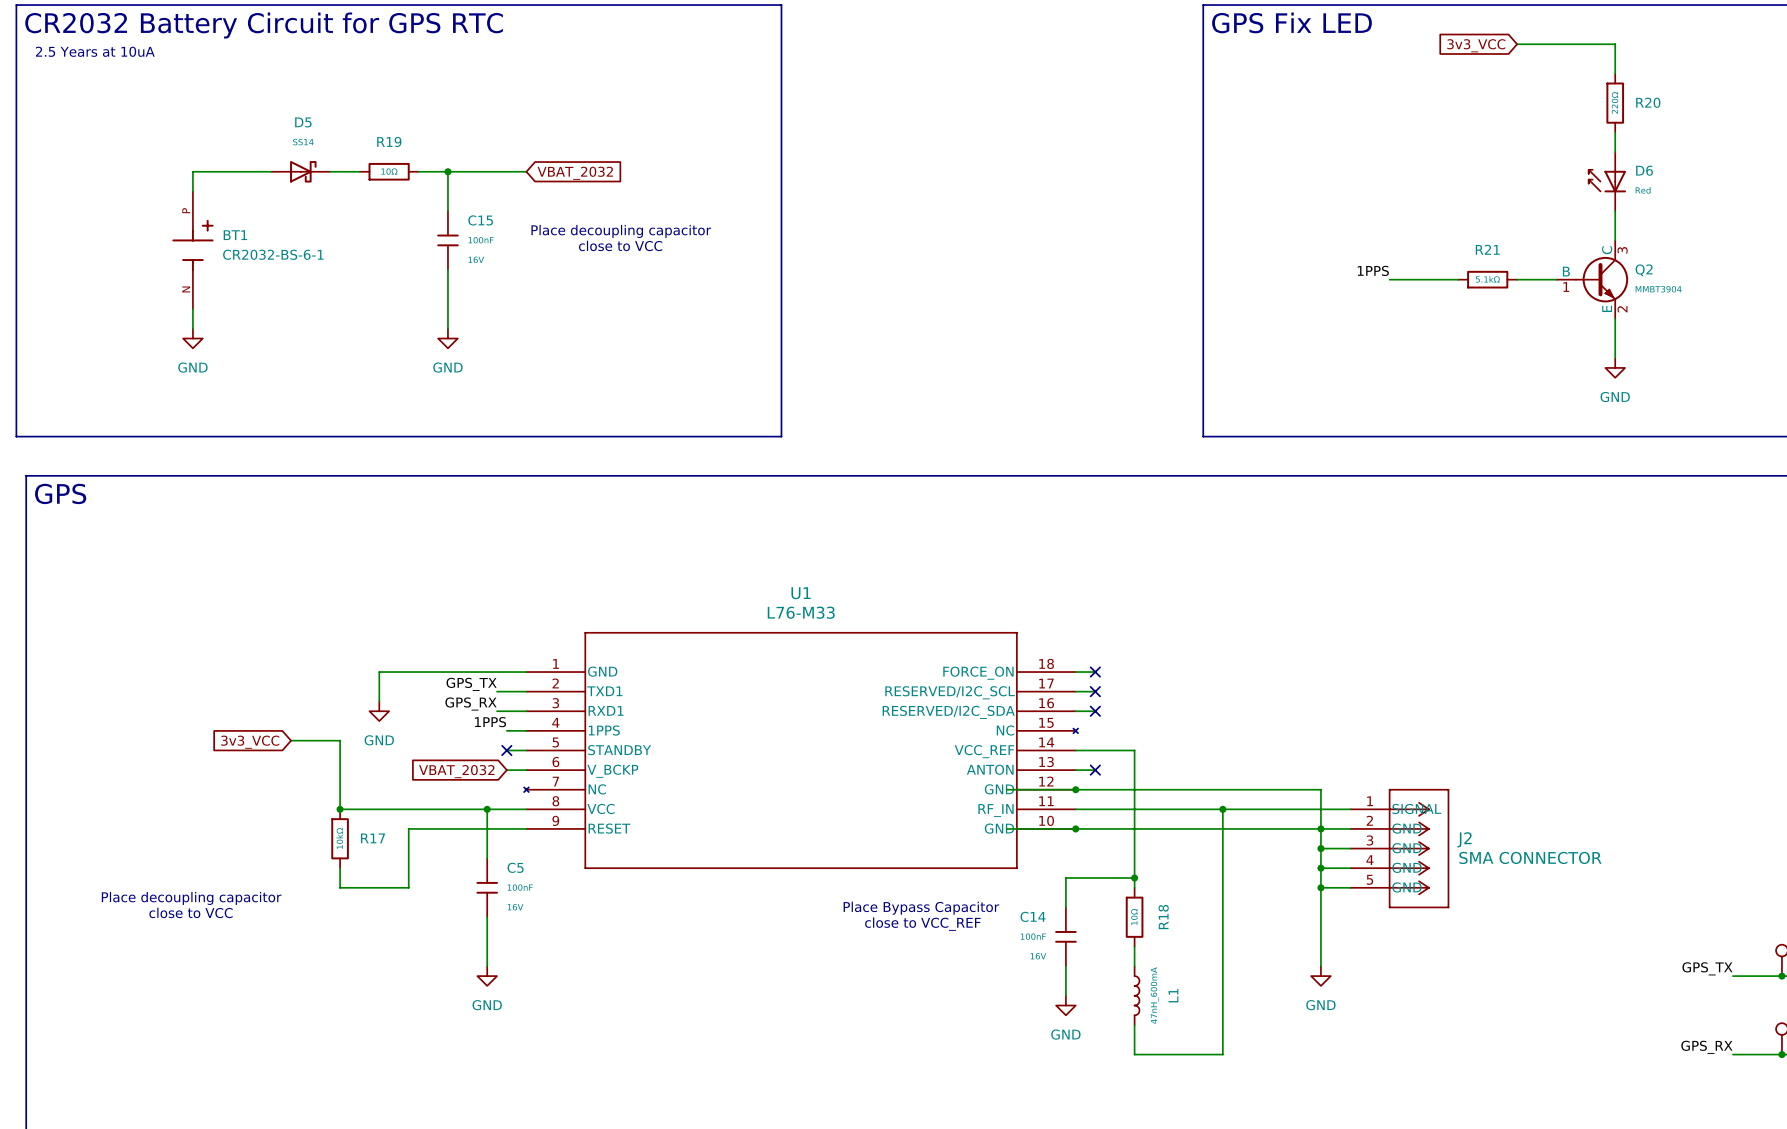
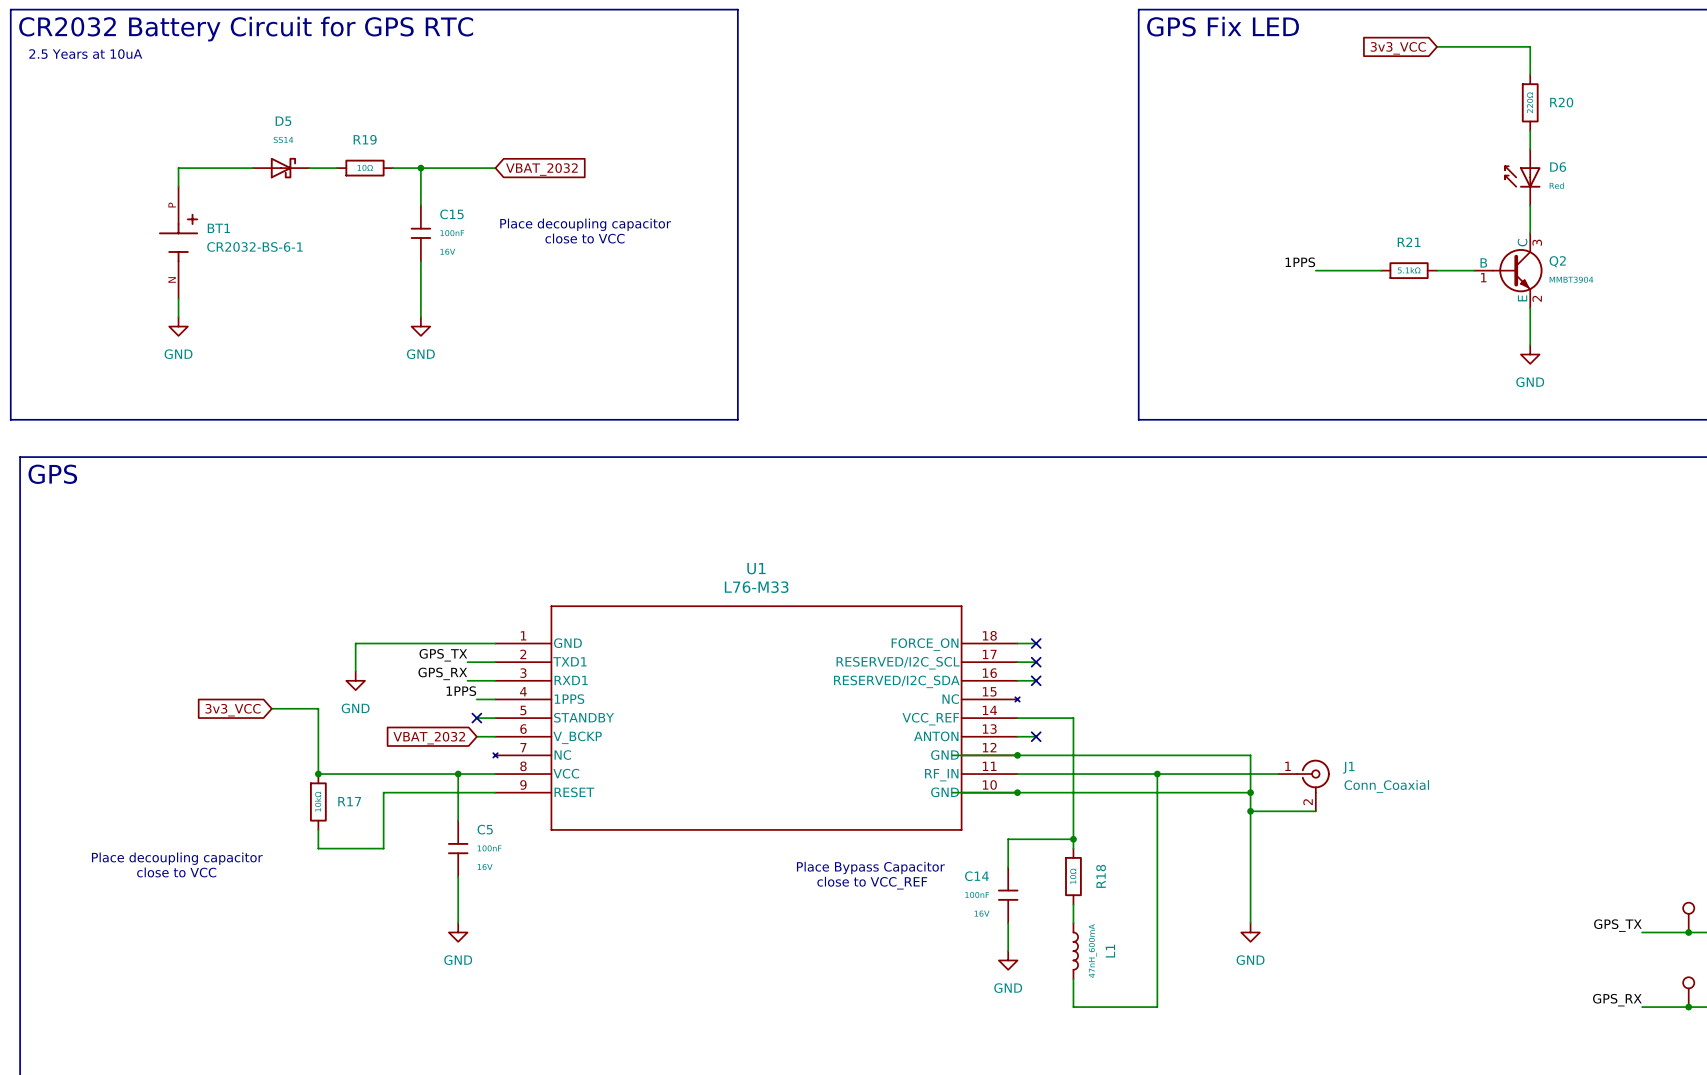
J1: none -> Conn_Coaxial (1304, 785)
wire: (1320, 828) (1350, 828) -> none
J2: SMA CONNECTOR (1399, 848) -> none
wire: (1320, 868) (1350, 868) -> none
junction: (1320, 868) -> none
wire: (1320, 887) (1350, 887) -> none
junction: (1320, 887) -> none

